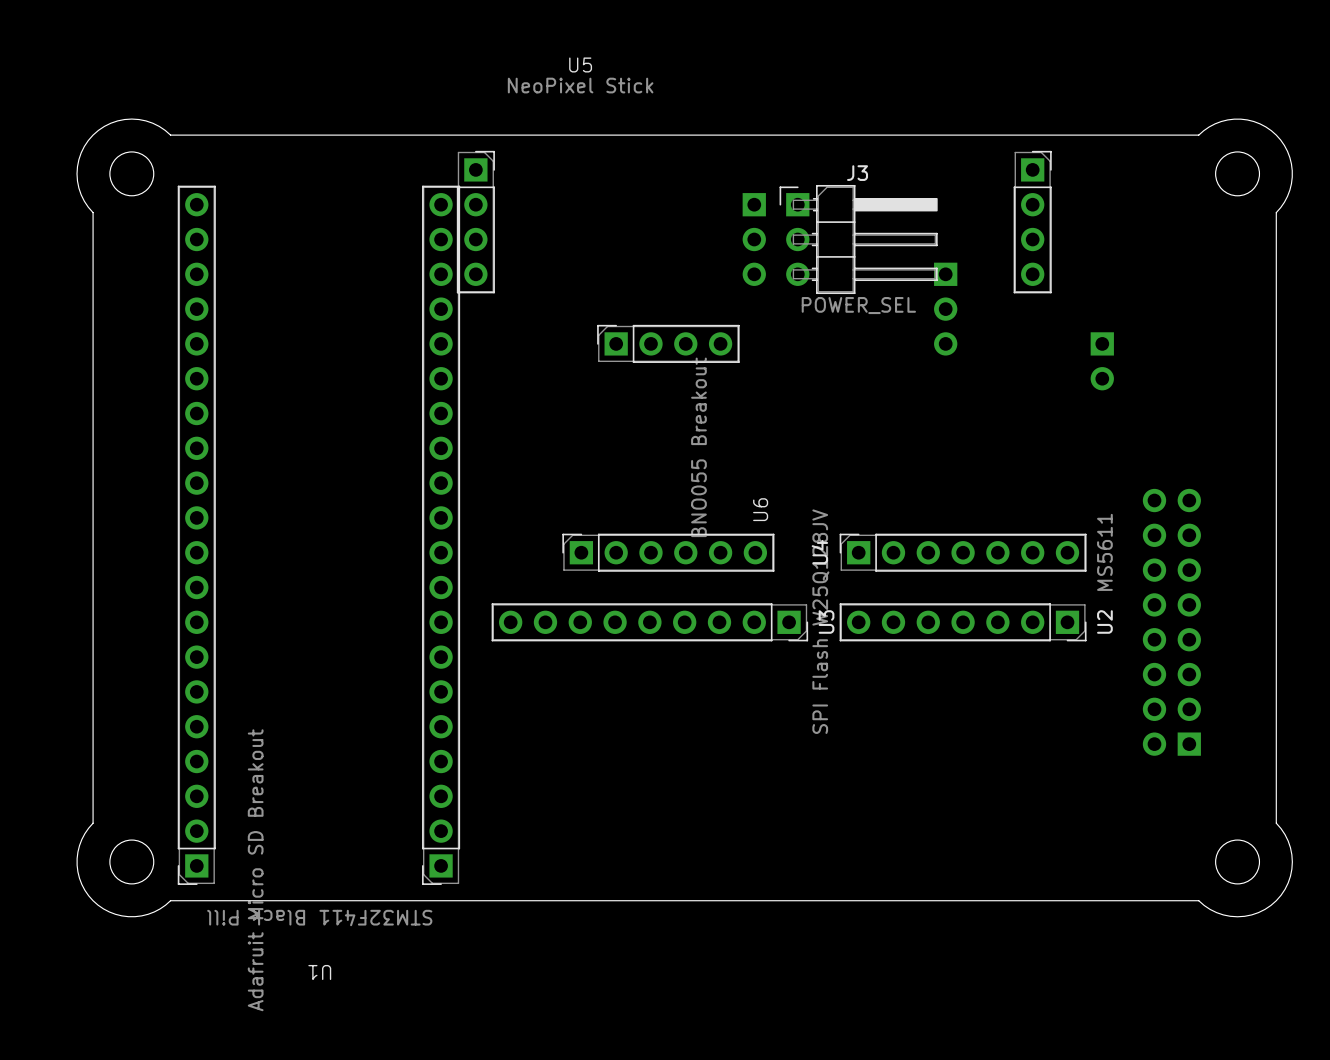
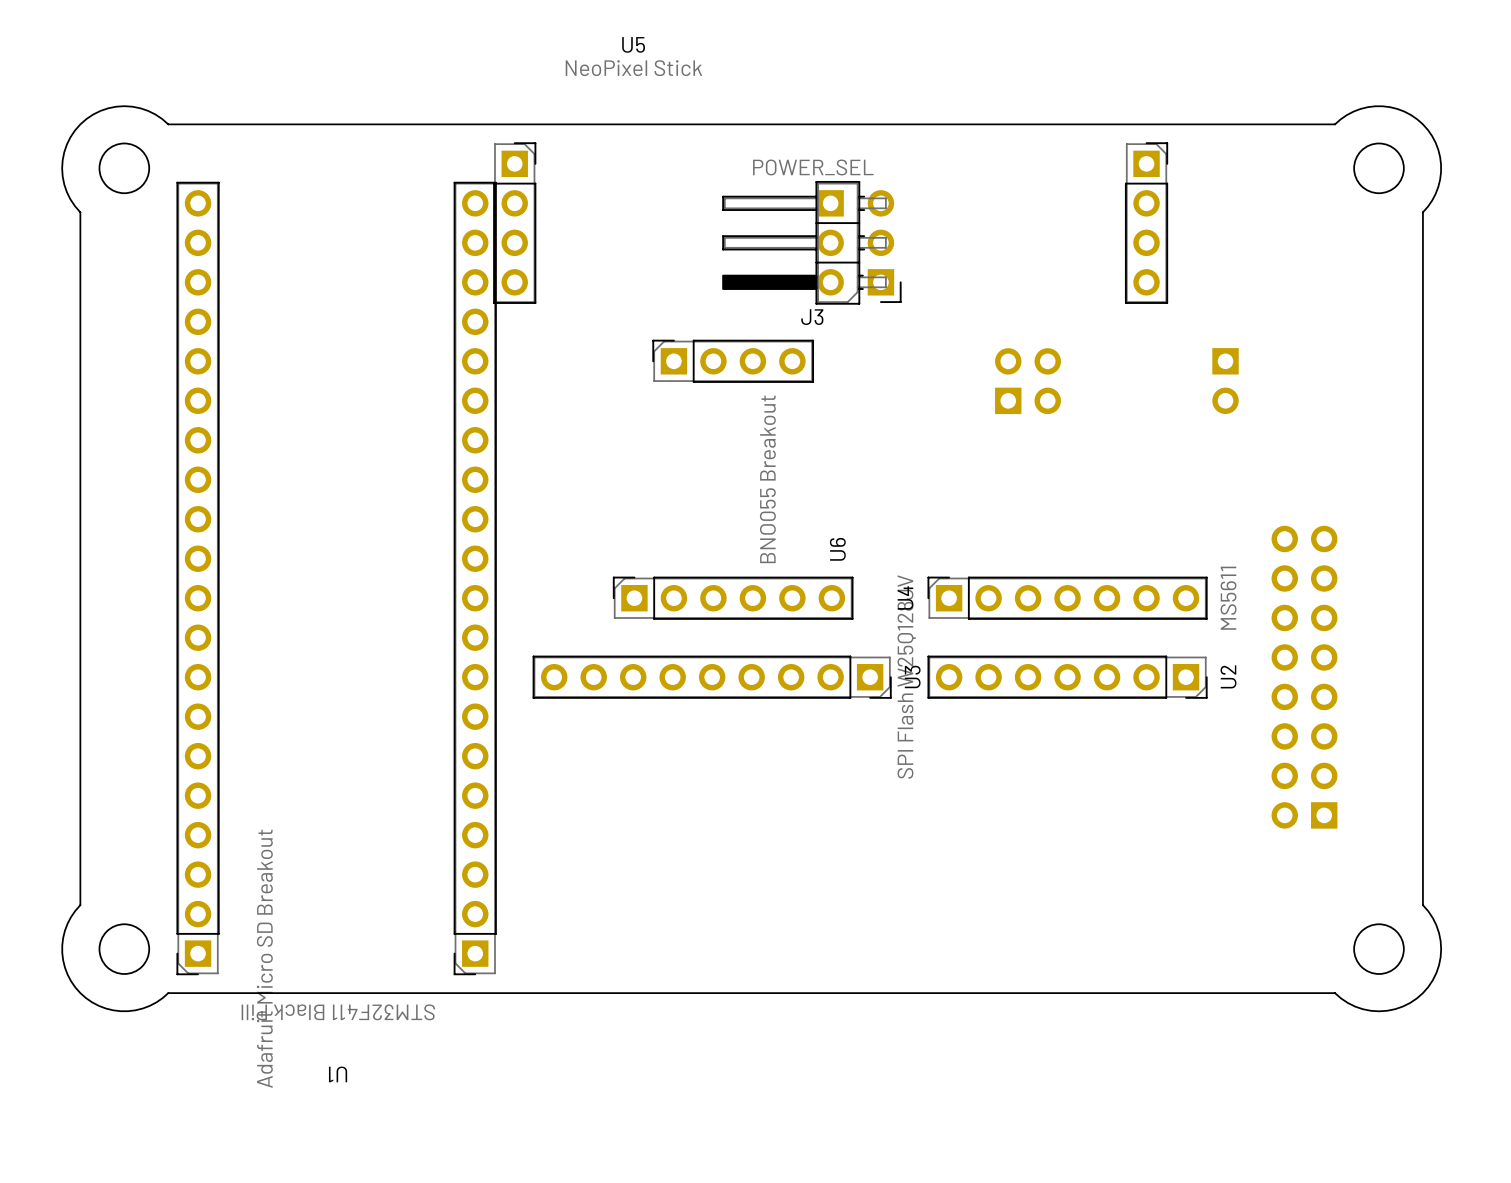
J3 rotation: 0° (858, 239) -> 180° (811, 242)
J3 position: (858, 239) -> (811, 242)
part: (945, 309) -> none
part: none -> (1028, 381)

